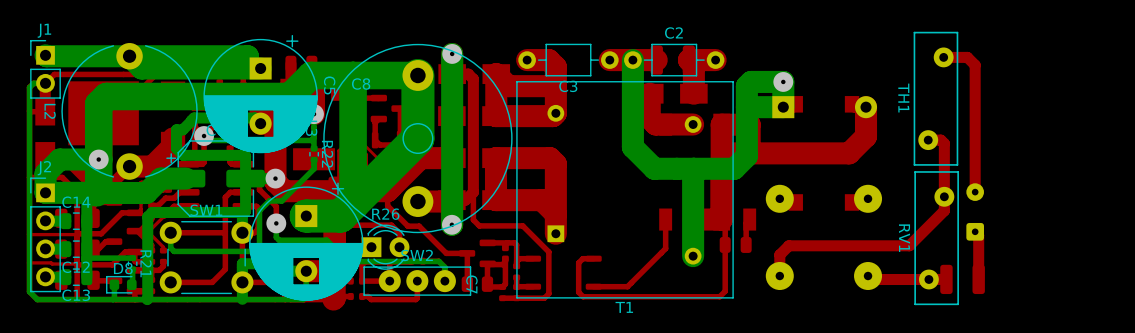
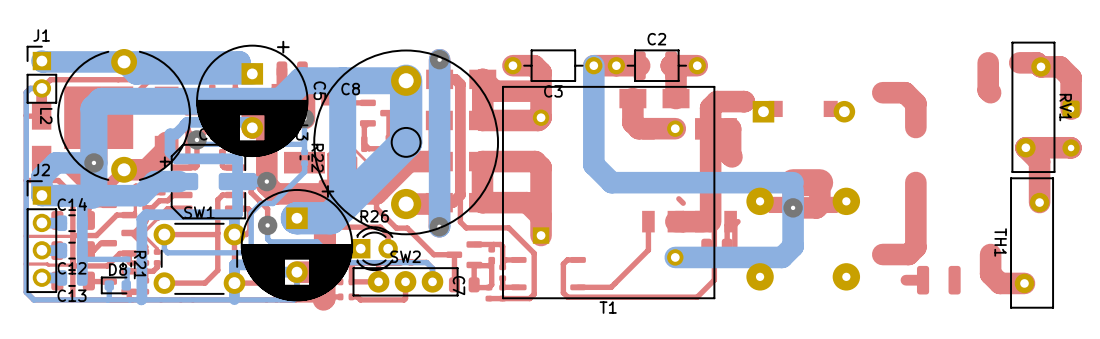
top track: (943, 57) (967, 57) (975, 65) (975, 192) -> none
top track: none -> (988, 62) (988, 90) (990, 92)
top track: none -> (1019, 62) (1036, 62) (1040, 66) (1060, 66) (1071, 77) (1071, 109)
bottom track: none -> (593, 65) (593, 164) (611, 182) (793, 182)
bottom track: (632, 60) (632, 147) (654, 168) (734, 168) (746, 156) (746, 86) (751, 81) (783, 81) (783, 107) (746, 107) -> none
via: (783, 81) -> none
top track: none -> (882, 92) (905, 92) (915, 103) (915, 127)
TH1 position: (935, 98) -> (1032, 243)
top track: (852, 104) (854, 107) (866, 107) (866, 136) (849, 153) (728, 153) (721, 160) -> none
top track: (729, 124) (721, 124) (721, 219) (725, 223) (725, 291) (719, 296) (715, 296) -> (744, 101) (716, 101) (710, 107) (710, 221) (714, 225) (714, 280) (697, 297)
top track: (928, 140) (940, 140) (944, 143) (944, 210) (909, 245) (788, 245) (779, 254) (779, 276) -> none
top track: none -> (1071, 148) (1025, 147) (1039, 161) (1039, 202)
bottom track: (693, 168) (693, 256) -> (793, 190) (793, 246) (782, 257) (675, 257)
top track: none -> (819, 182) (819, 204) (816, 207) (793, 207) (793, 182) (819, 182)
top track: none -> (915, 182) (915, 247) (908, 254) (882, 254)
top track: none -> (678, 198) (683, 203)
via: none -> (793, 207)
part rotation: 0° (975, 211) -> 180° (1071, 128)
part position: (975, 211) -> (1071, 128)
top track: none -> (738, 221) (734, 224) (734, 246)
top track: (975, 231) (978, 235) (978, 279) -> none
RV1 name position: RV1 (904, 238) -> RV1 (1065, 107)
RV1 position: (936, 238) -> (1033, 107)
top track: none -> (990, 254) (990, 274) (999, 283) (1024, 283)
top track: (868, 276) (871, 279) (928, 279) -> none

